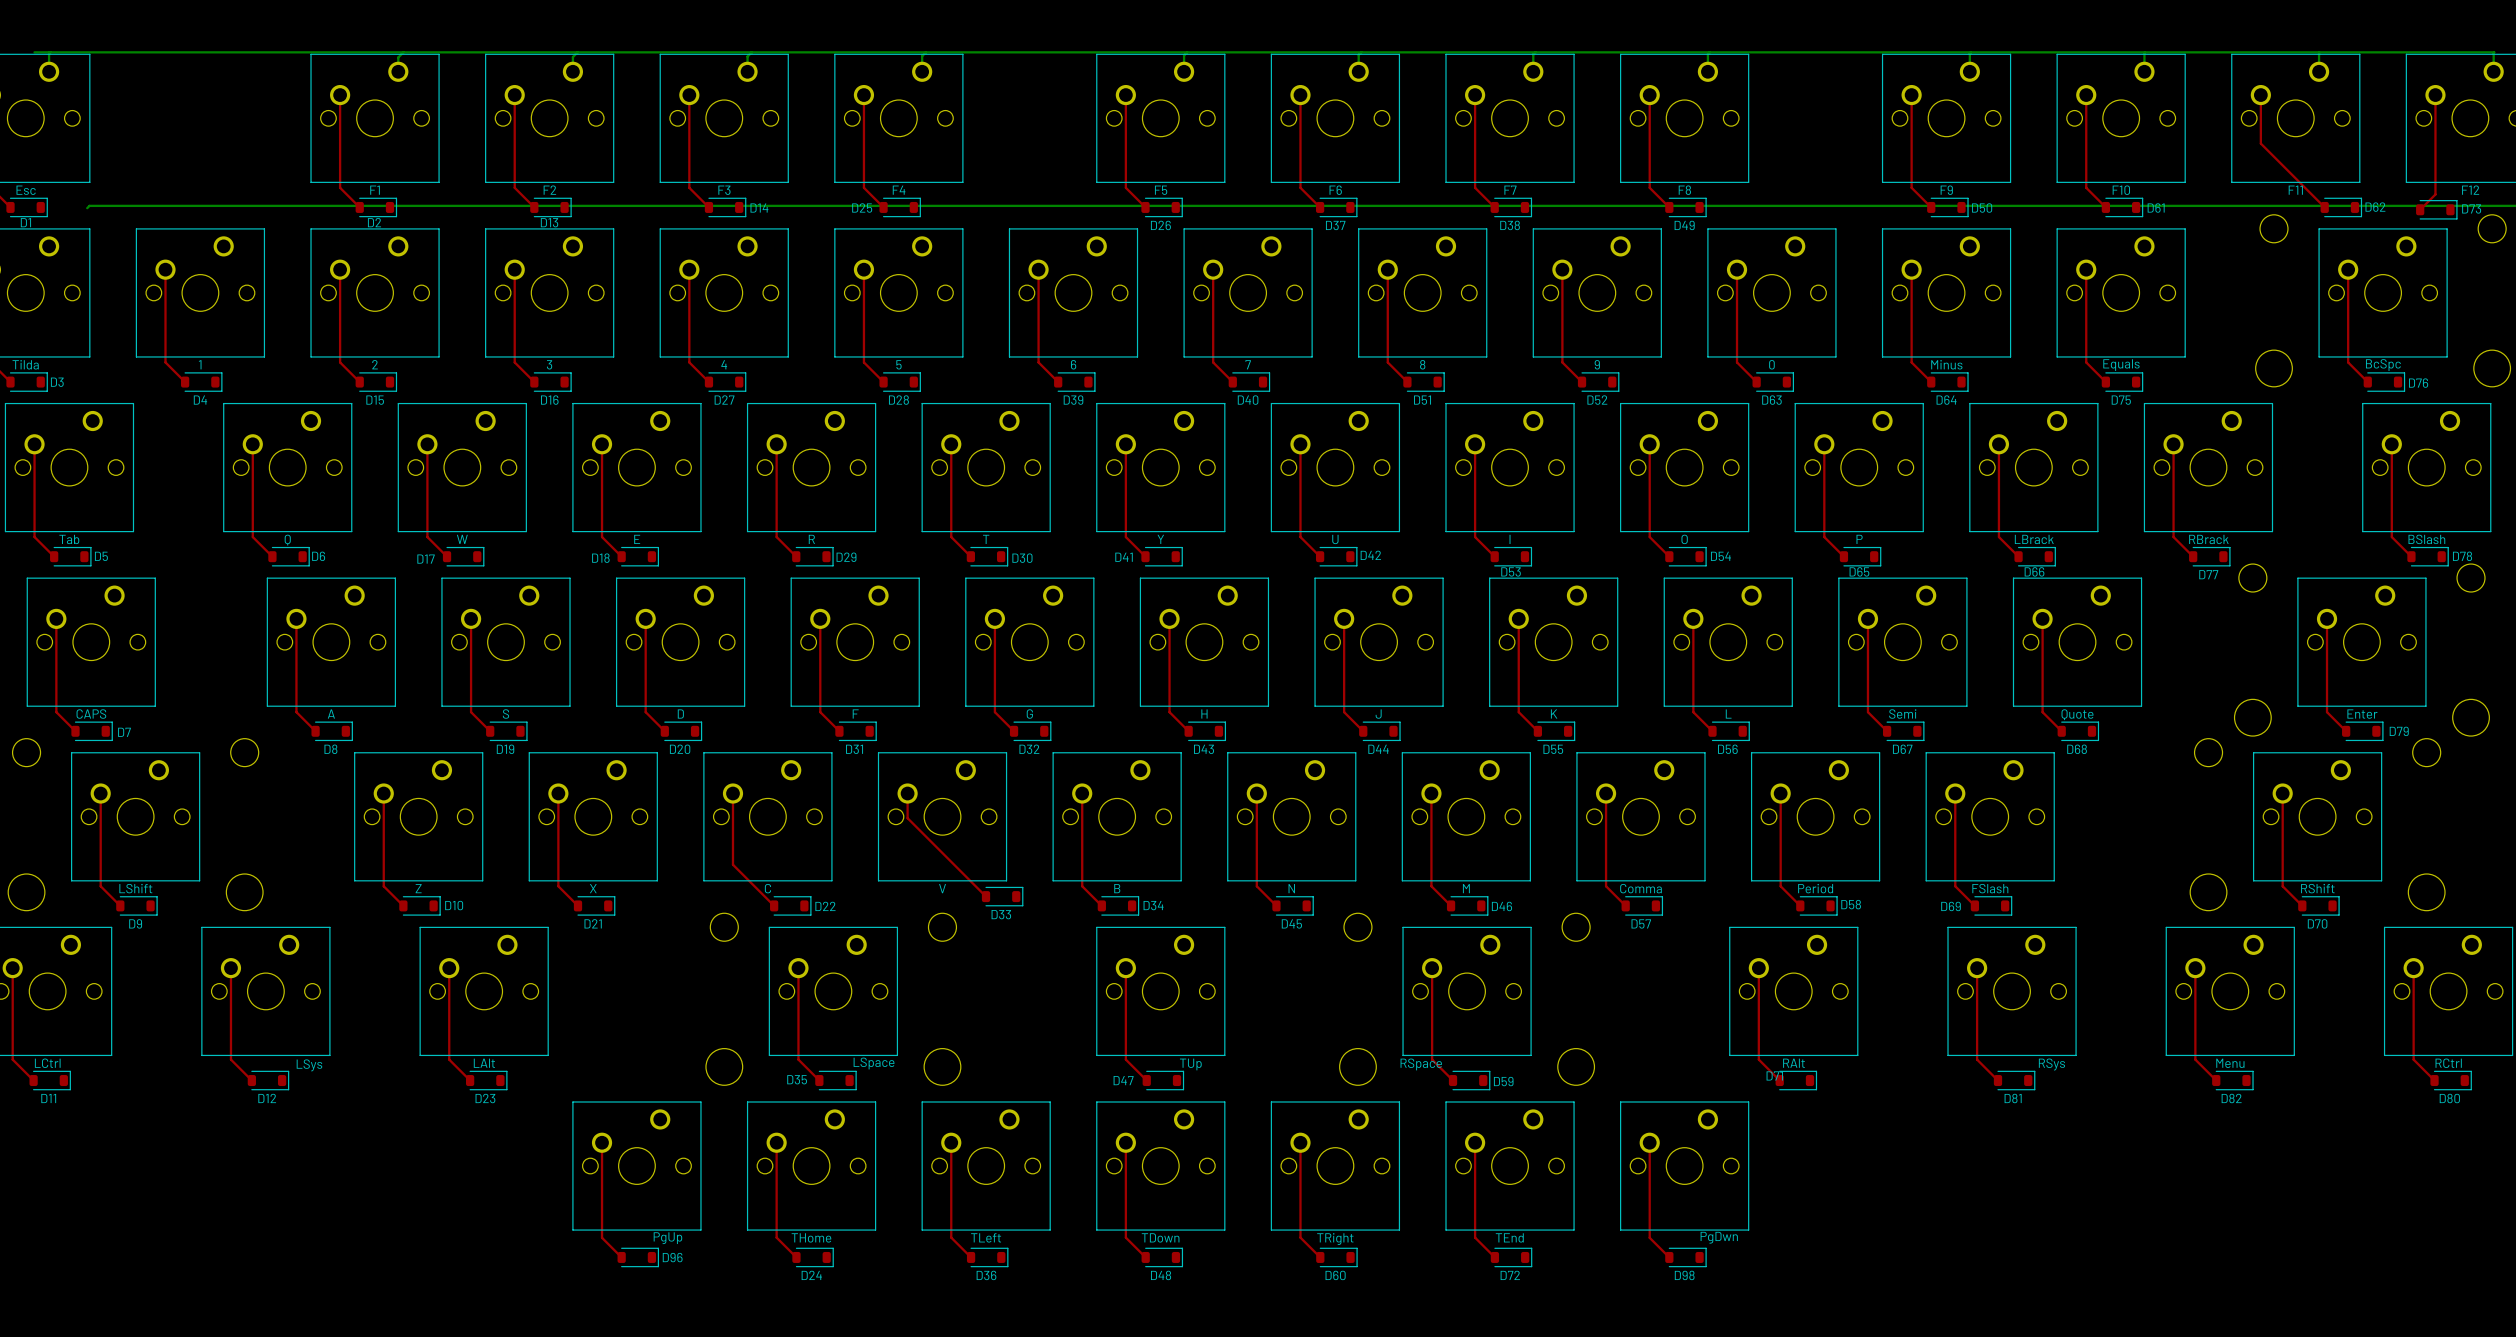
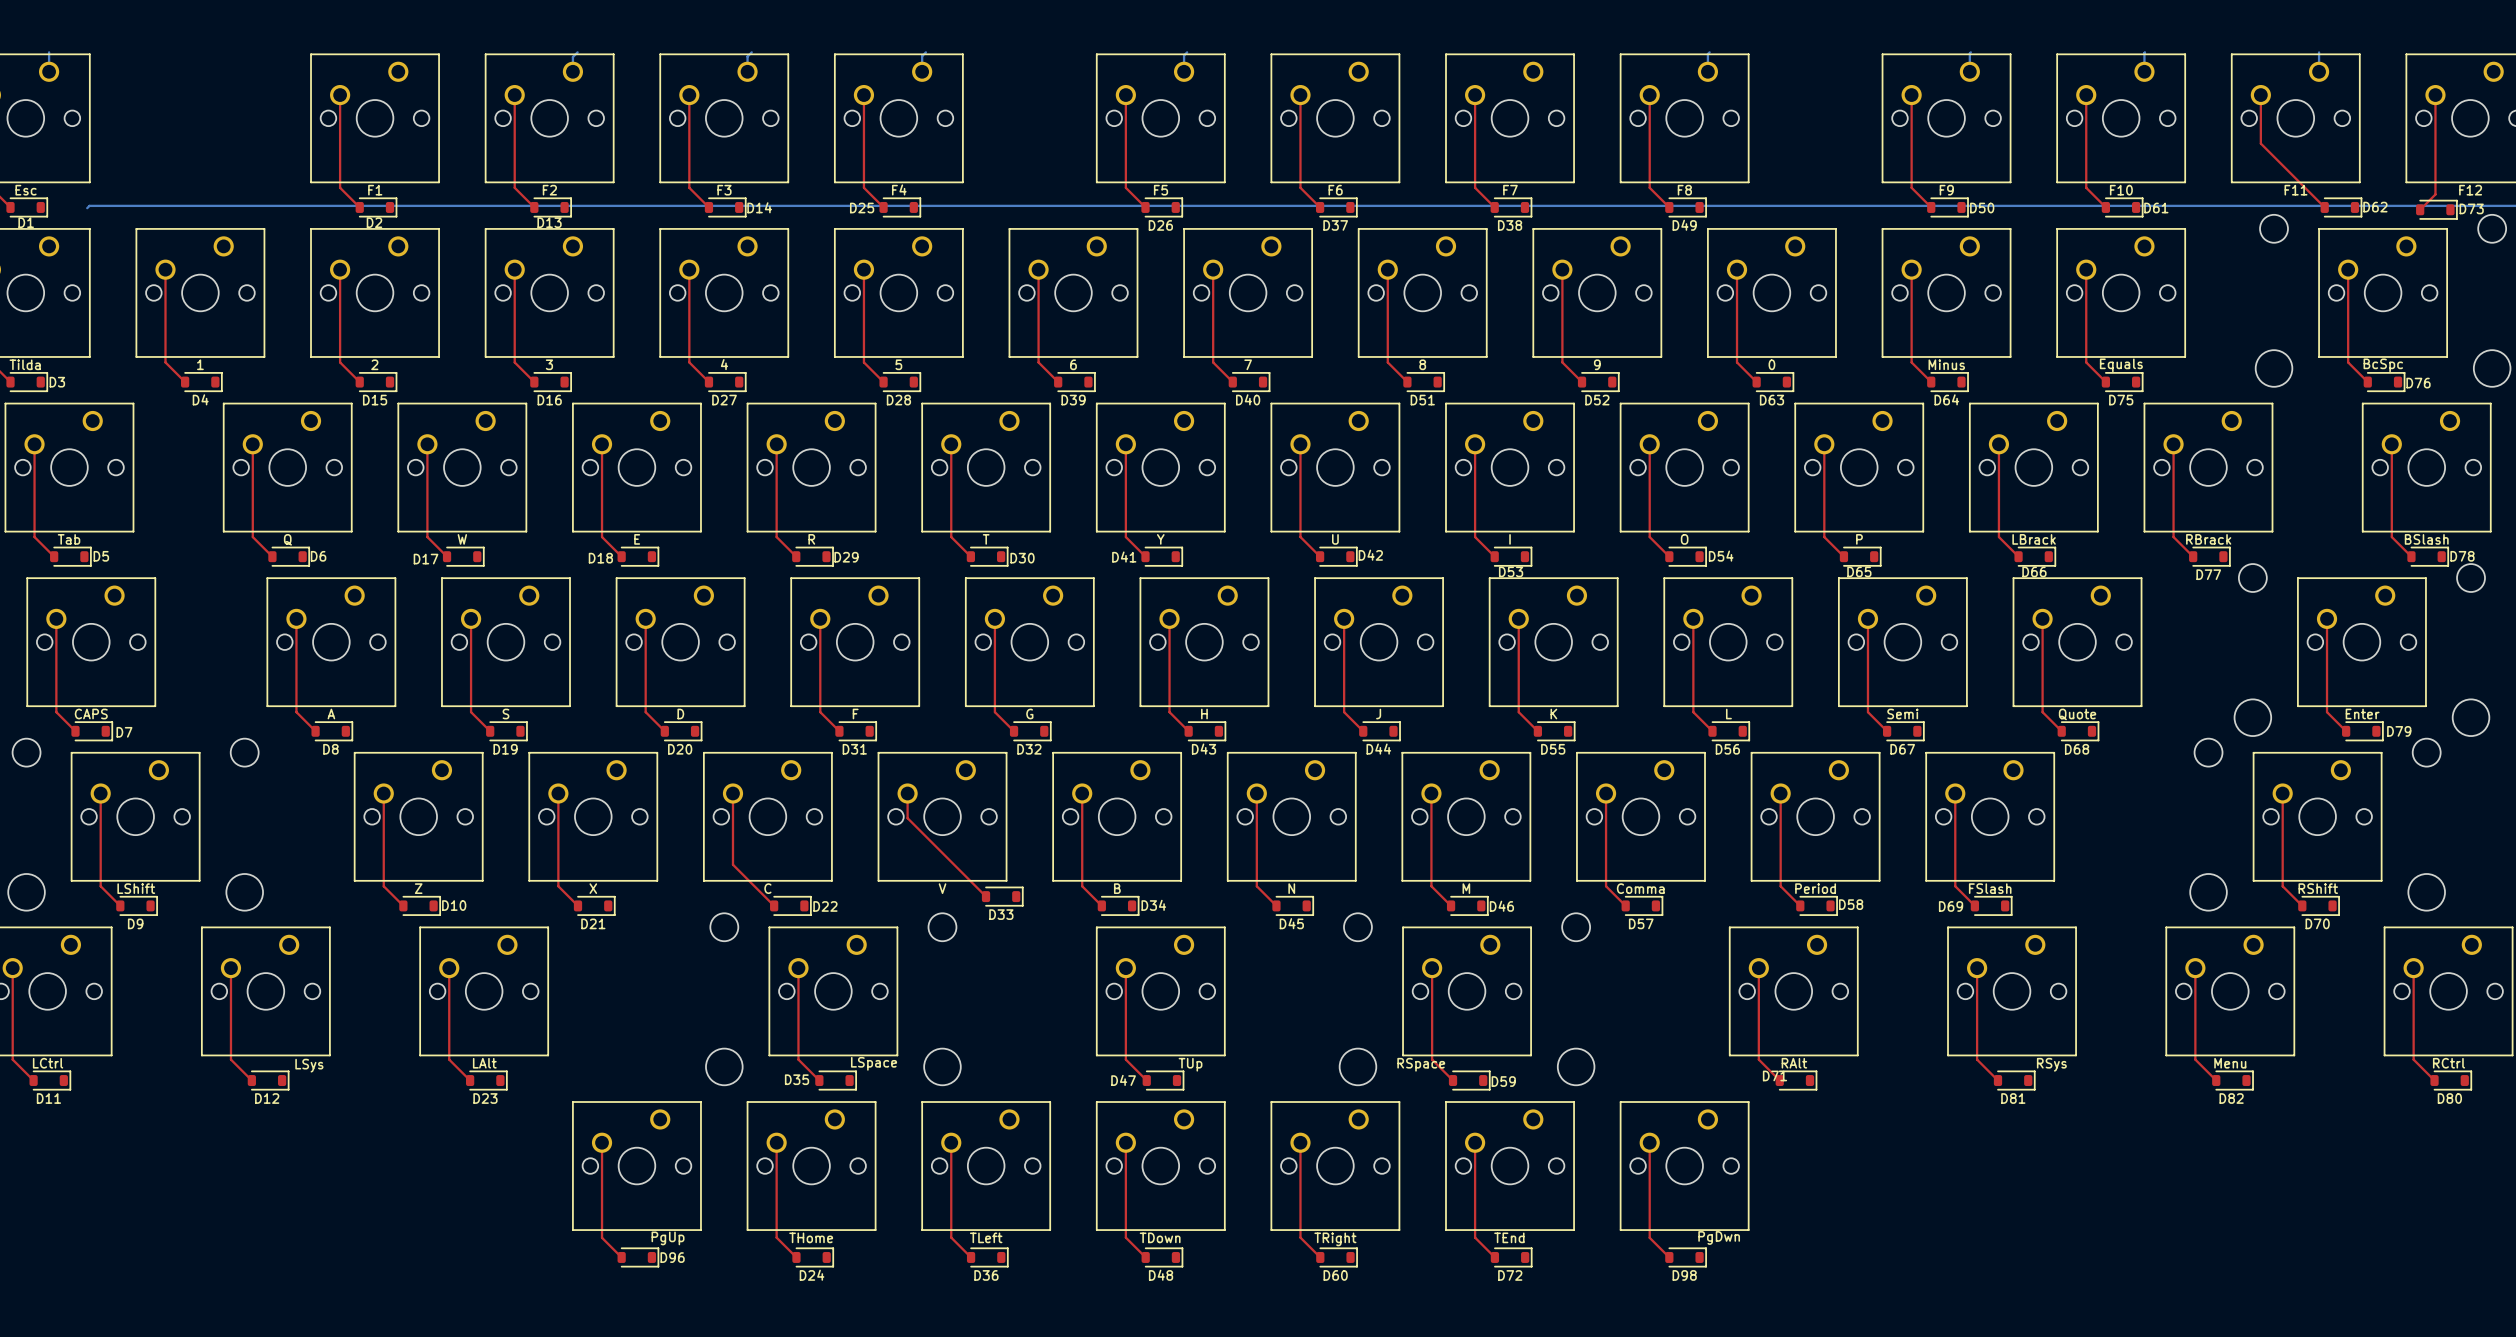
bottom track: (34, 52) (2494, 52) (2493, 71) -> none
bottom track: (403, 52) (398, 57) (398, 71) -> none
bottom track: (1361, 52) (1358, 54) (1358, 71) -> none
bottom track: (1535, 52) (1533, 54) (1533, 71) -> none

